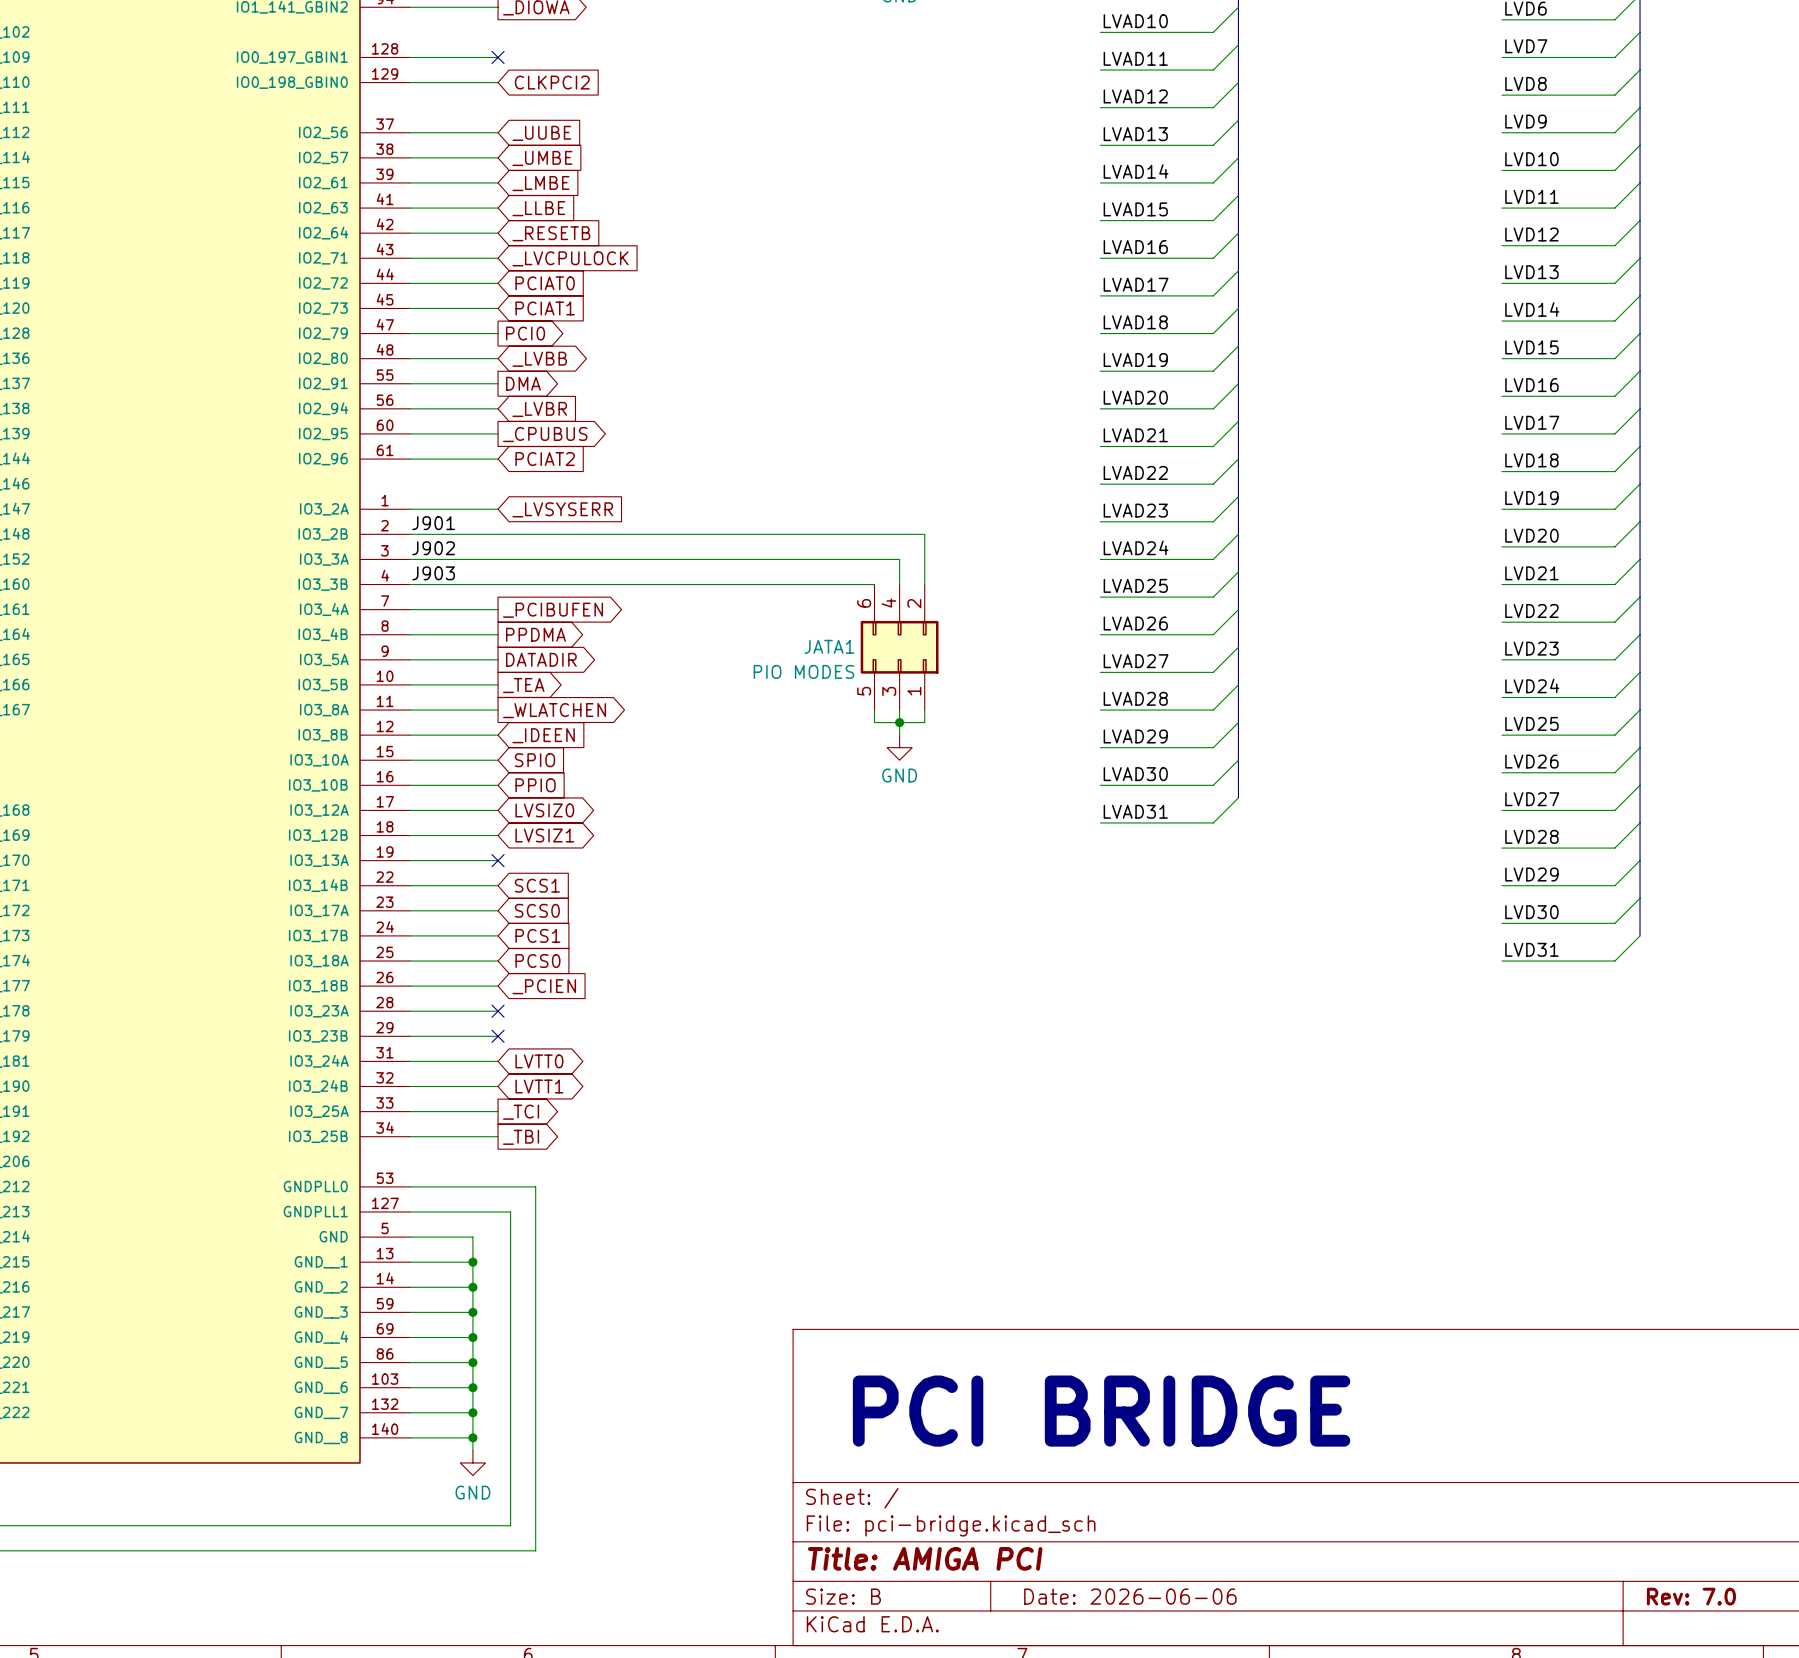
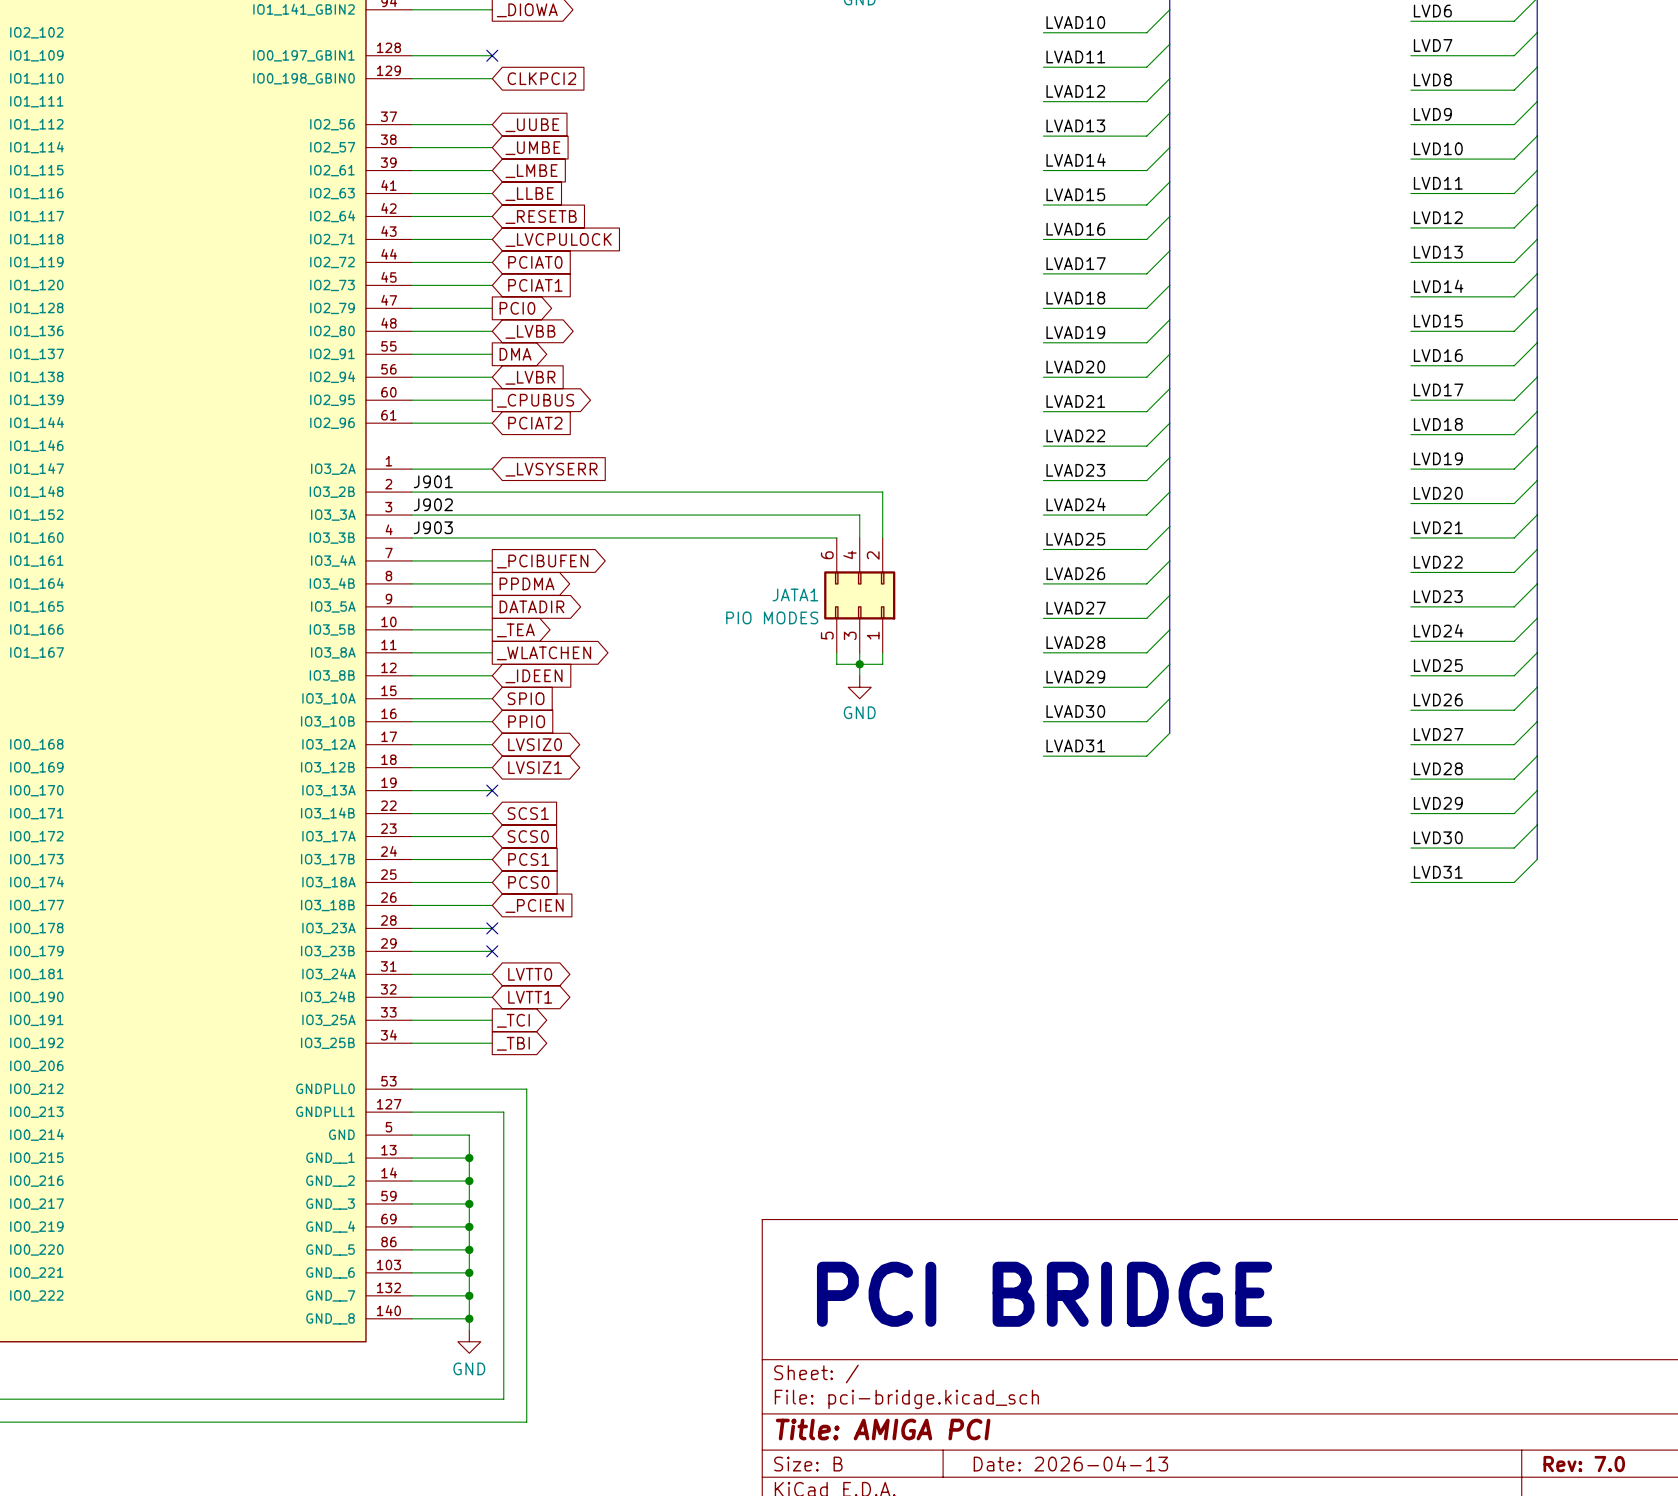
title block: Date: 2026-06-06 (1130, 1596) -> Date: 2026-04-13 (1070, 1463)

